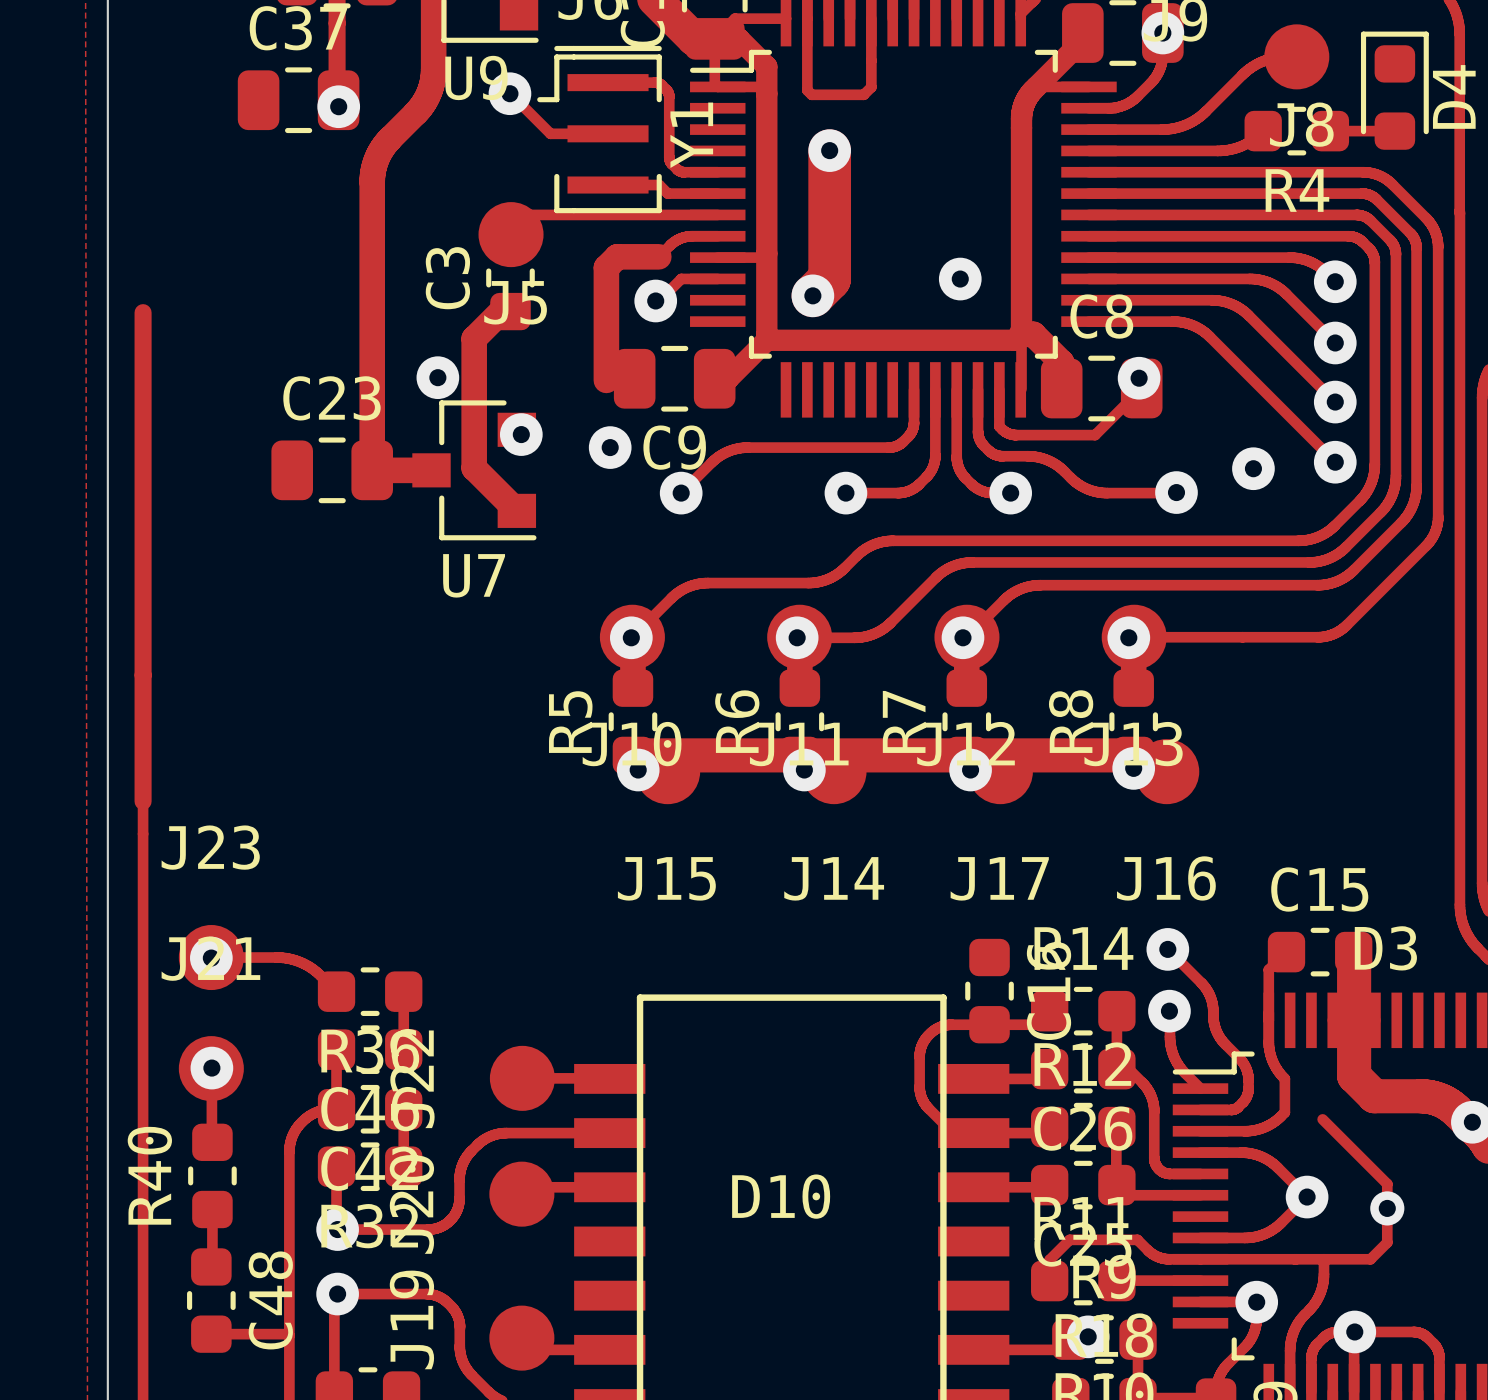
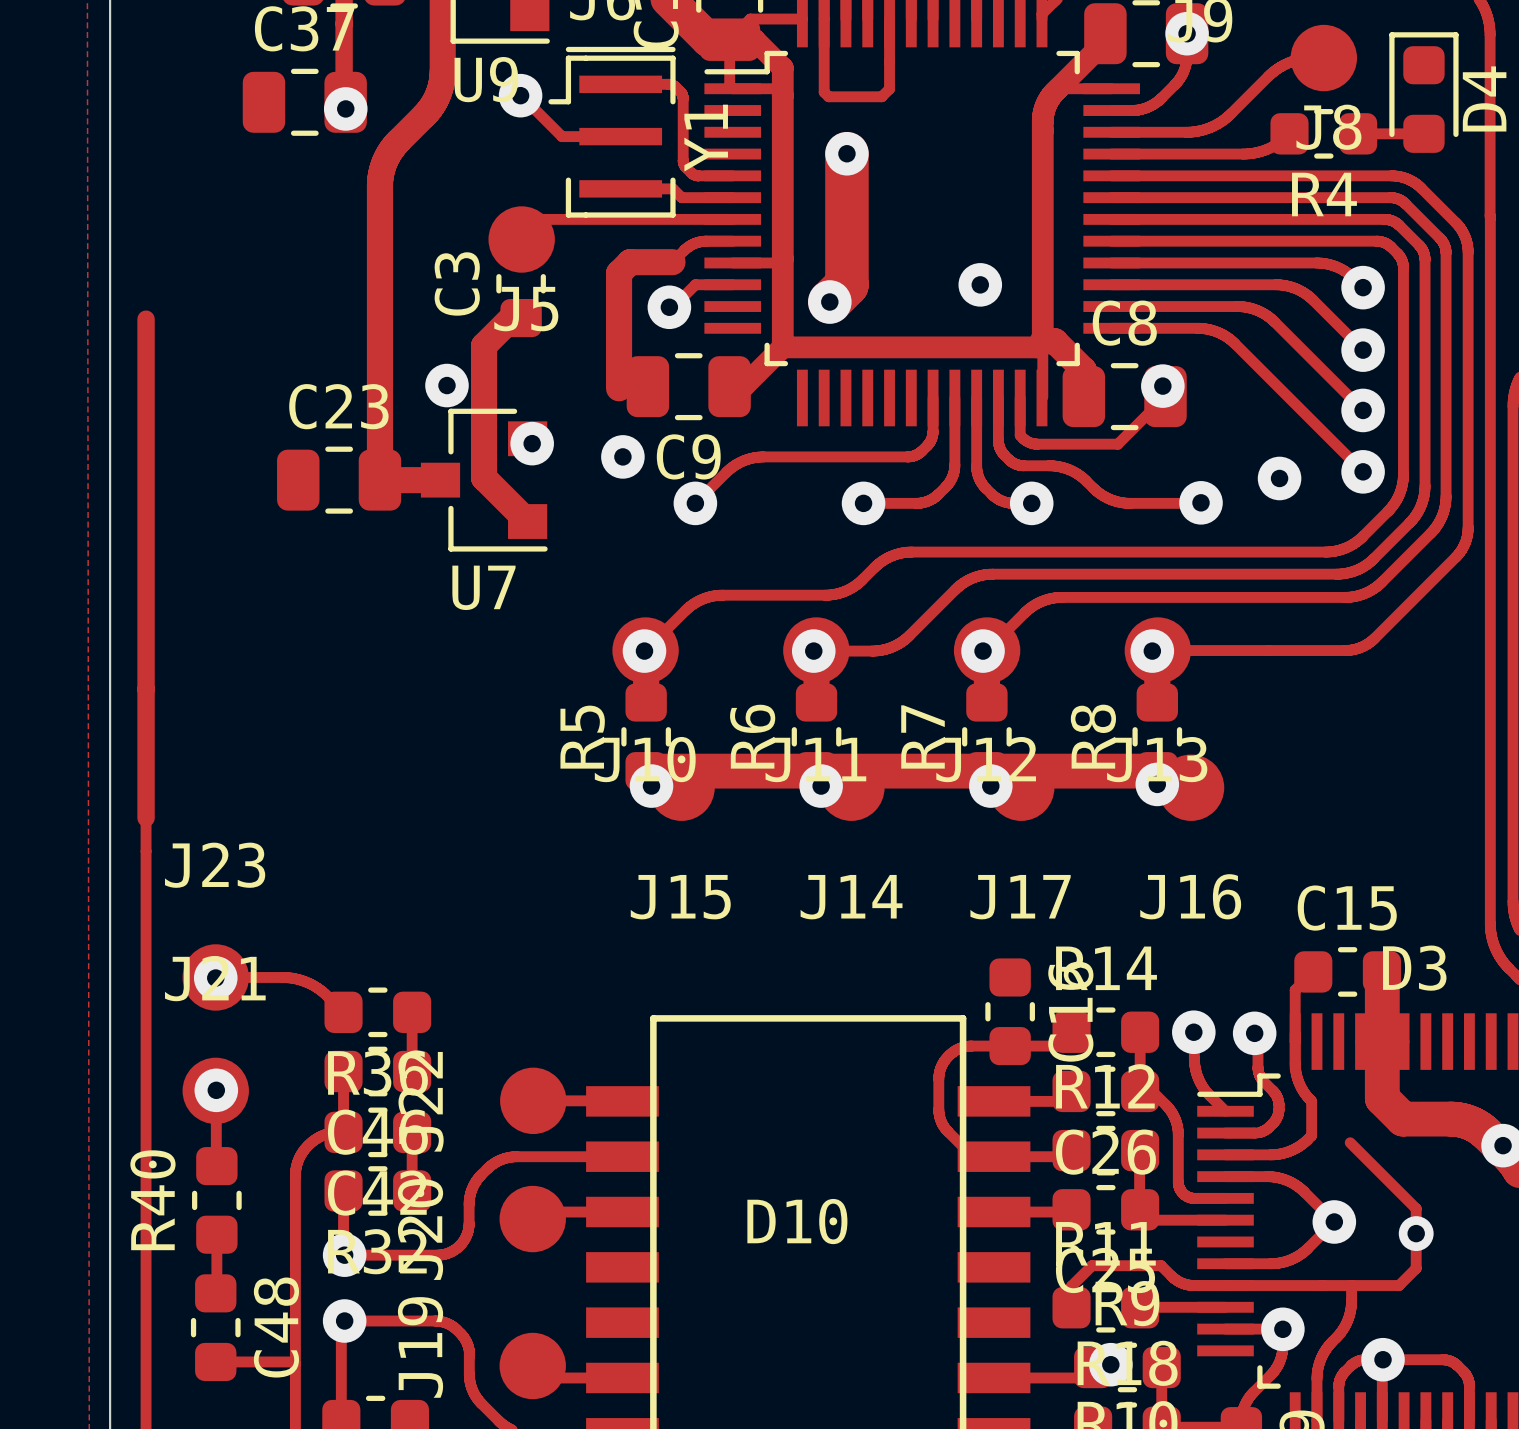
track: (1167, 949) (1206, 989) (1212, 1001) (1213, 1021) (1217, 1032) (1245, 1067) (1248, 1077) (1248, 1092) (1245, 1099) (1238, 1106) -> none
via position: (1167, 949) -> (1254, 1033)
track: none -> (1257, 1034) (1258, 1073) (1262, 1080) (1275, 1093) (1278, 1104) (1275, 1120) (1260, 1132)

